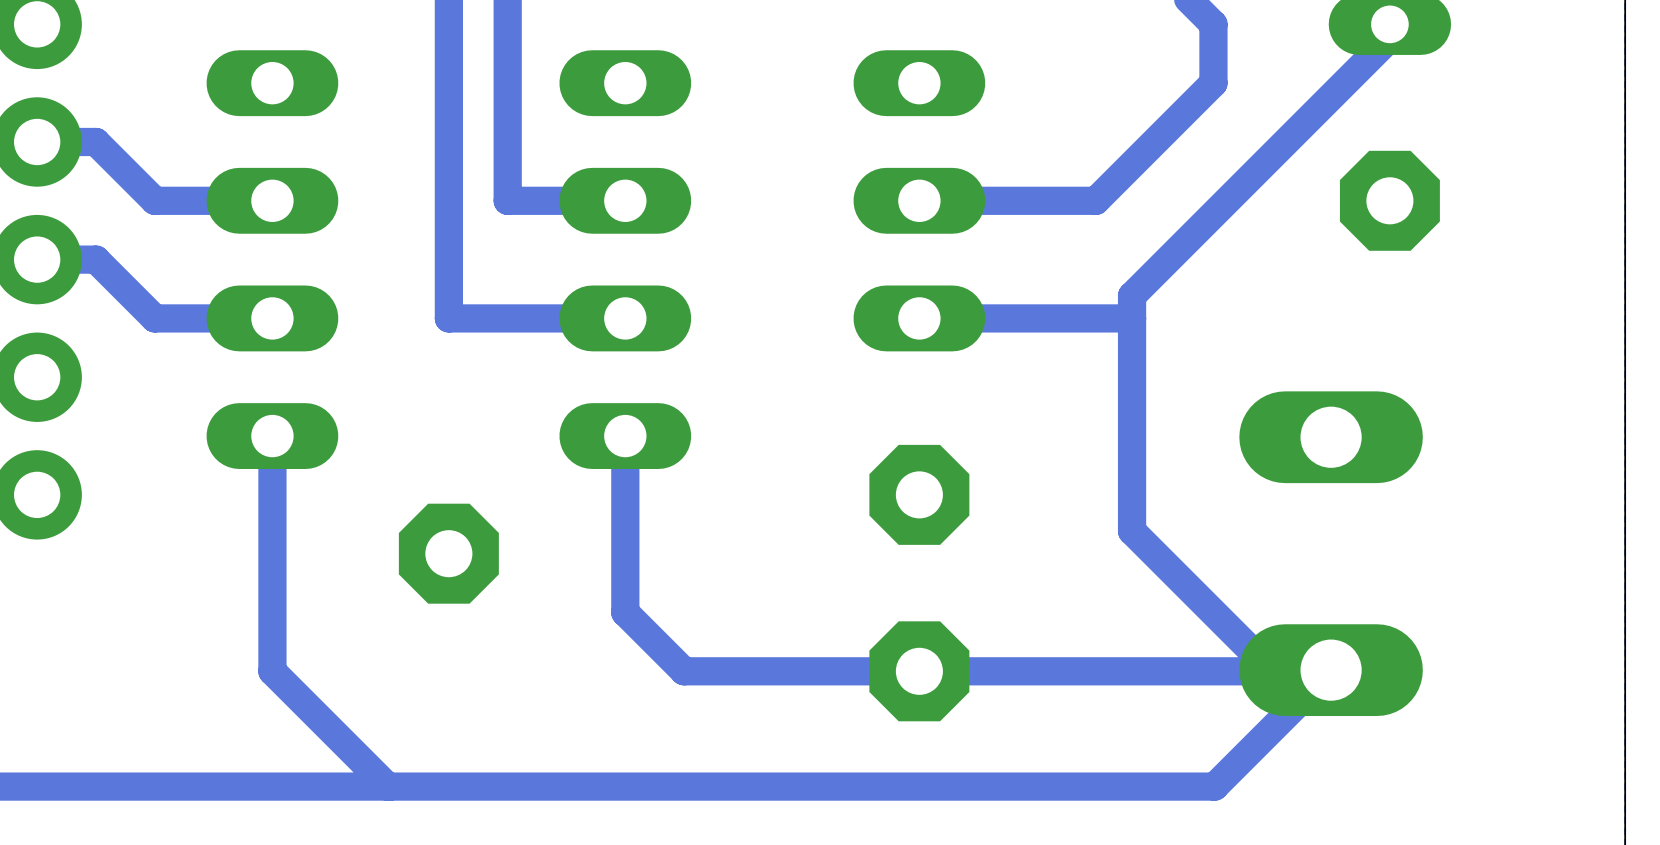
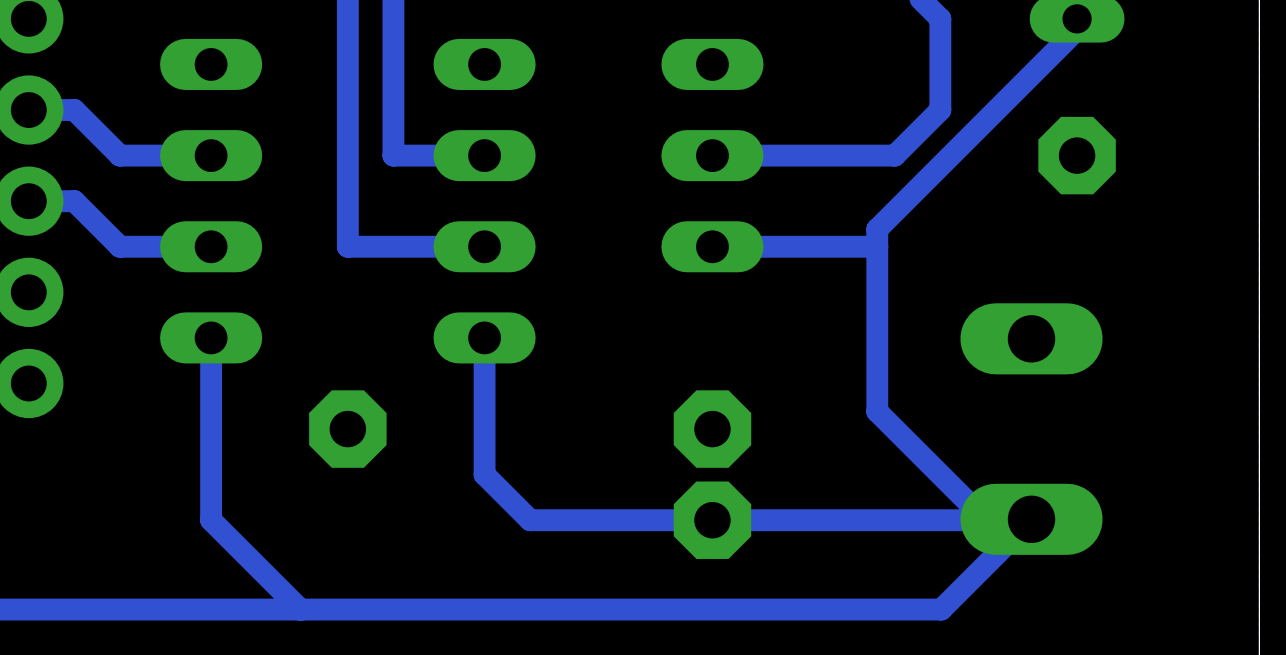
bottom track: (1213, 83) (1095, 200) -> (940, 64) (940, 110) (894, 155) (849, 155)
part position: (919, 494) -> (712, 429)

